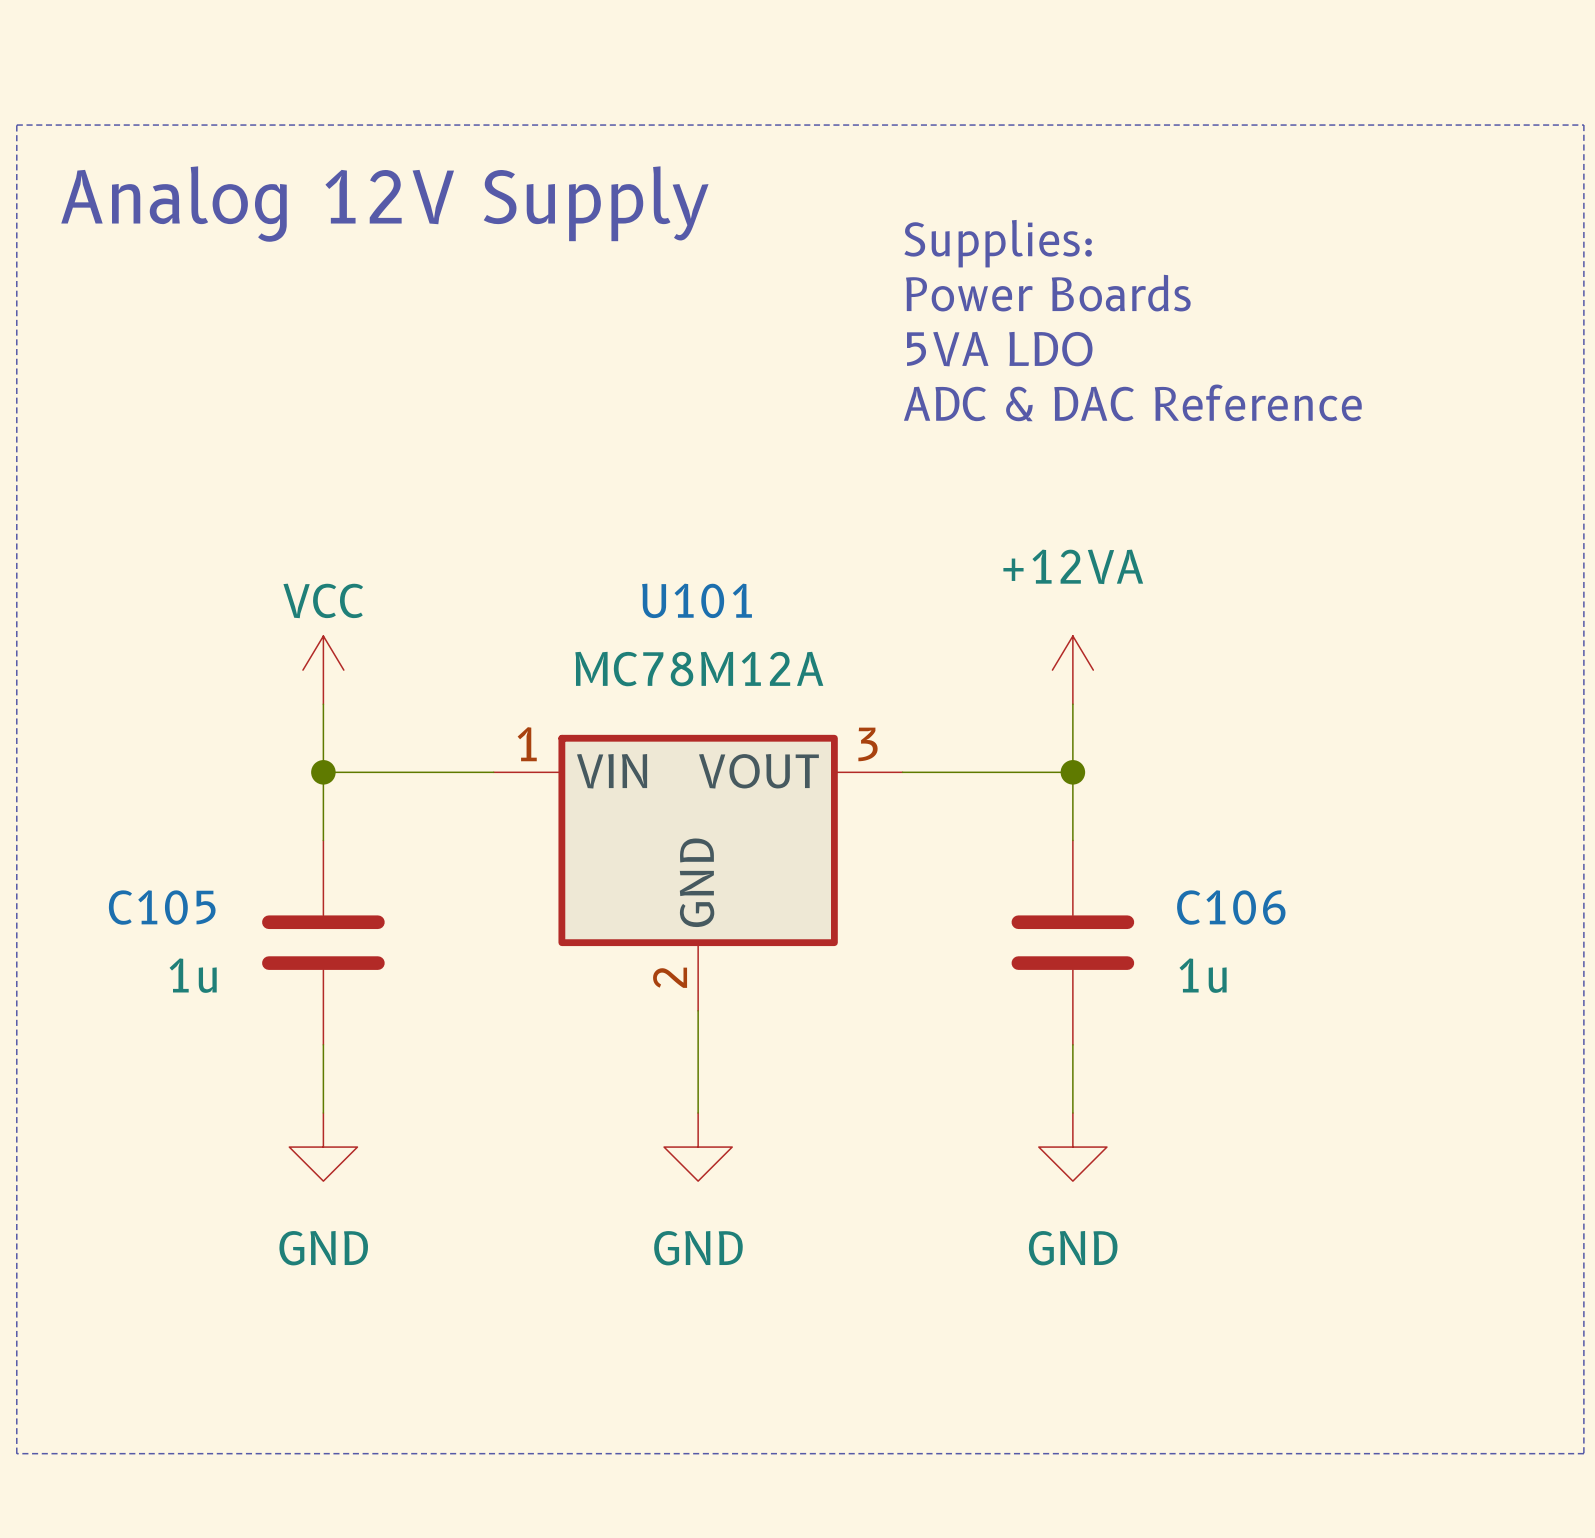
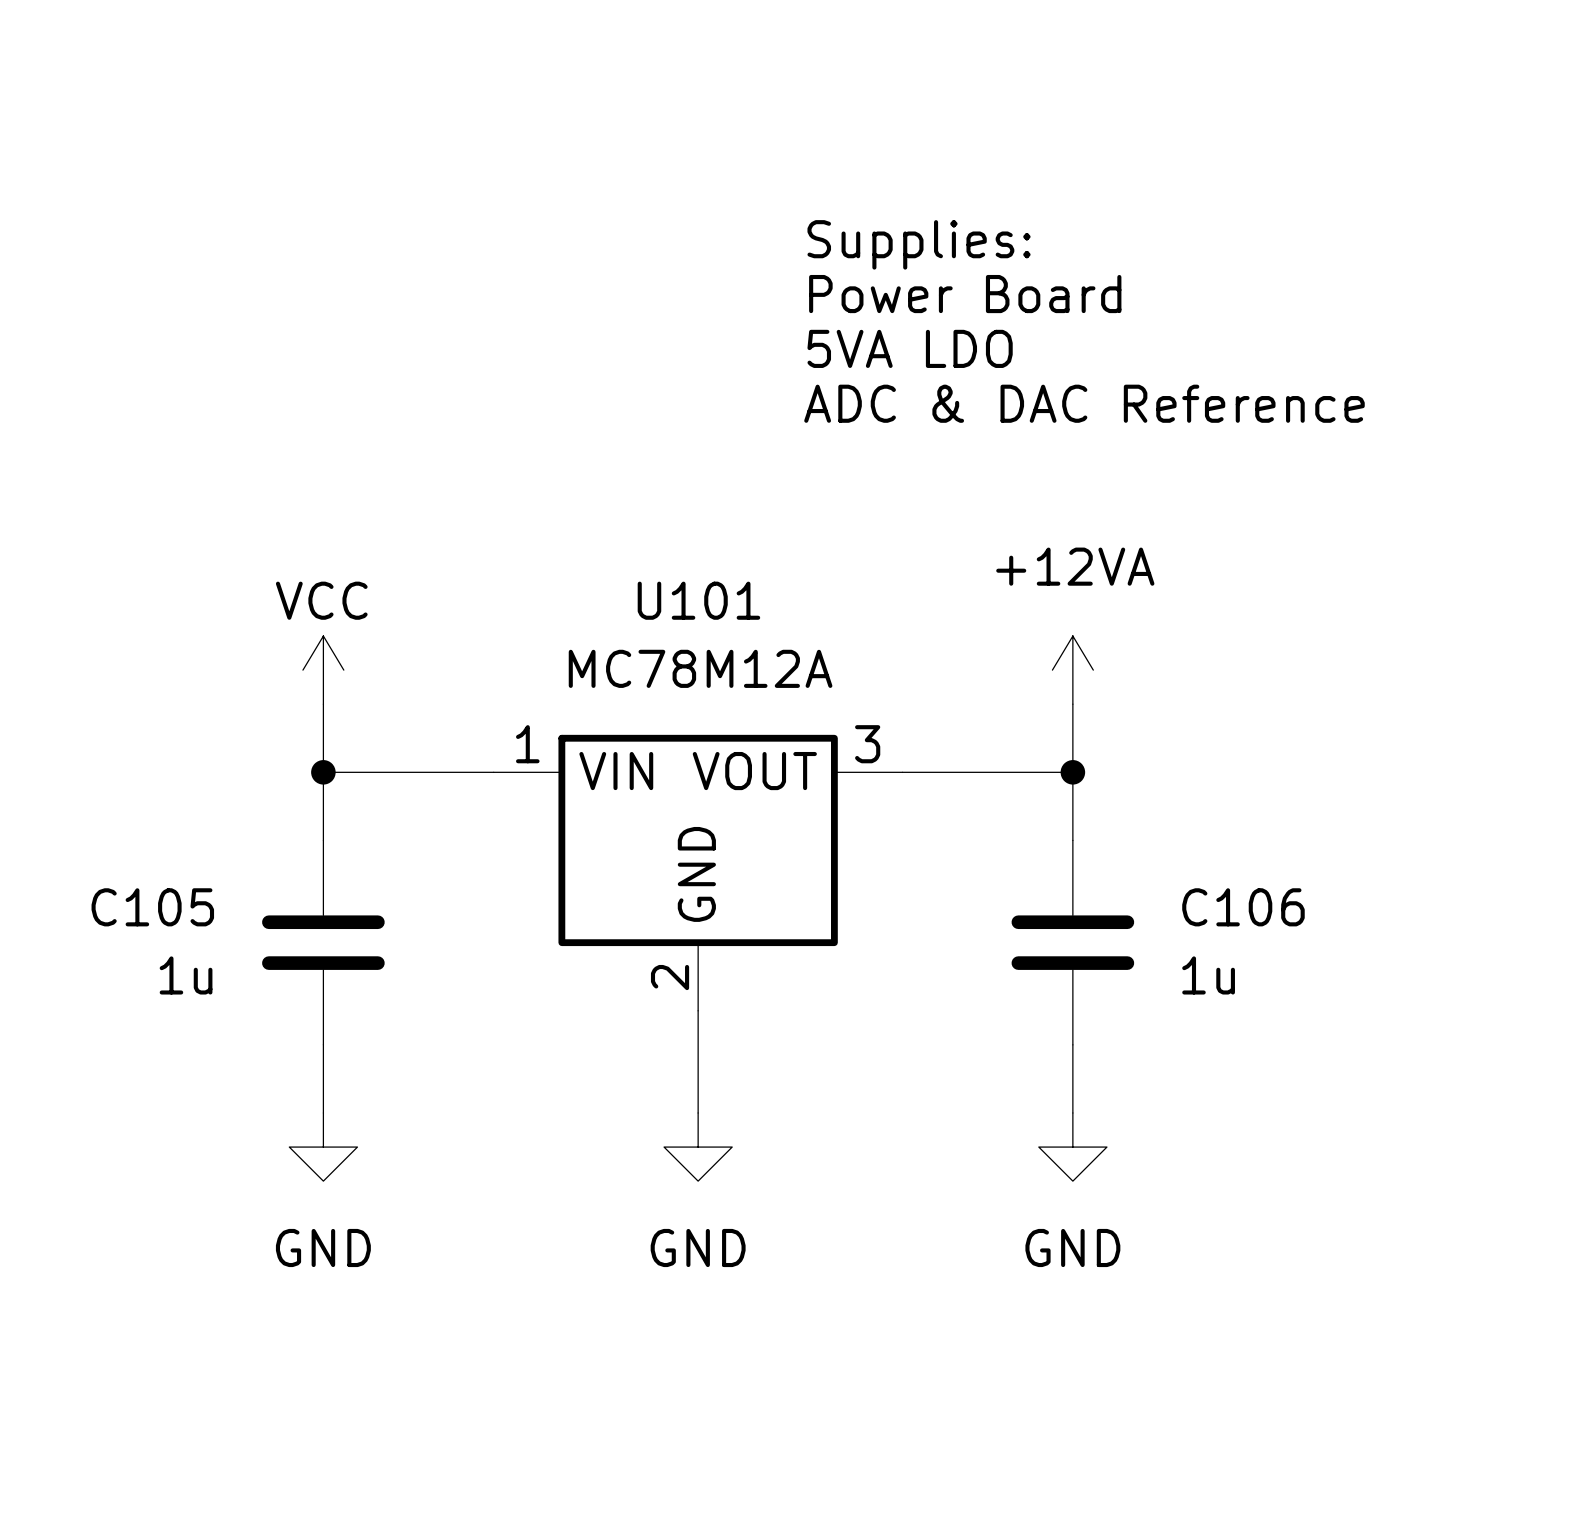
line: (16, 125) (1583, 125) (1583, 1453) (16, 1453) (16, 125) -> none
text: Analog 12V Supply (384, 204) -> none
text position: Supplies: (998, 243) -> Supplies: (919, 244)
text: Power Boards (1048, 293) -> Power Board (965, 294)
text position: 5VA LDO (999, 349) -> 5VA LDO (910, 348)
text position: ADC & DAC Reference (1132, 402) -> ADC & DAC Reference (1084, 403)

